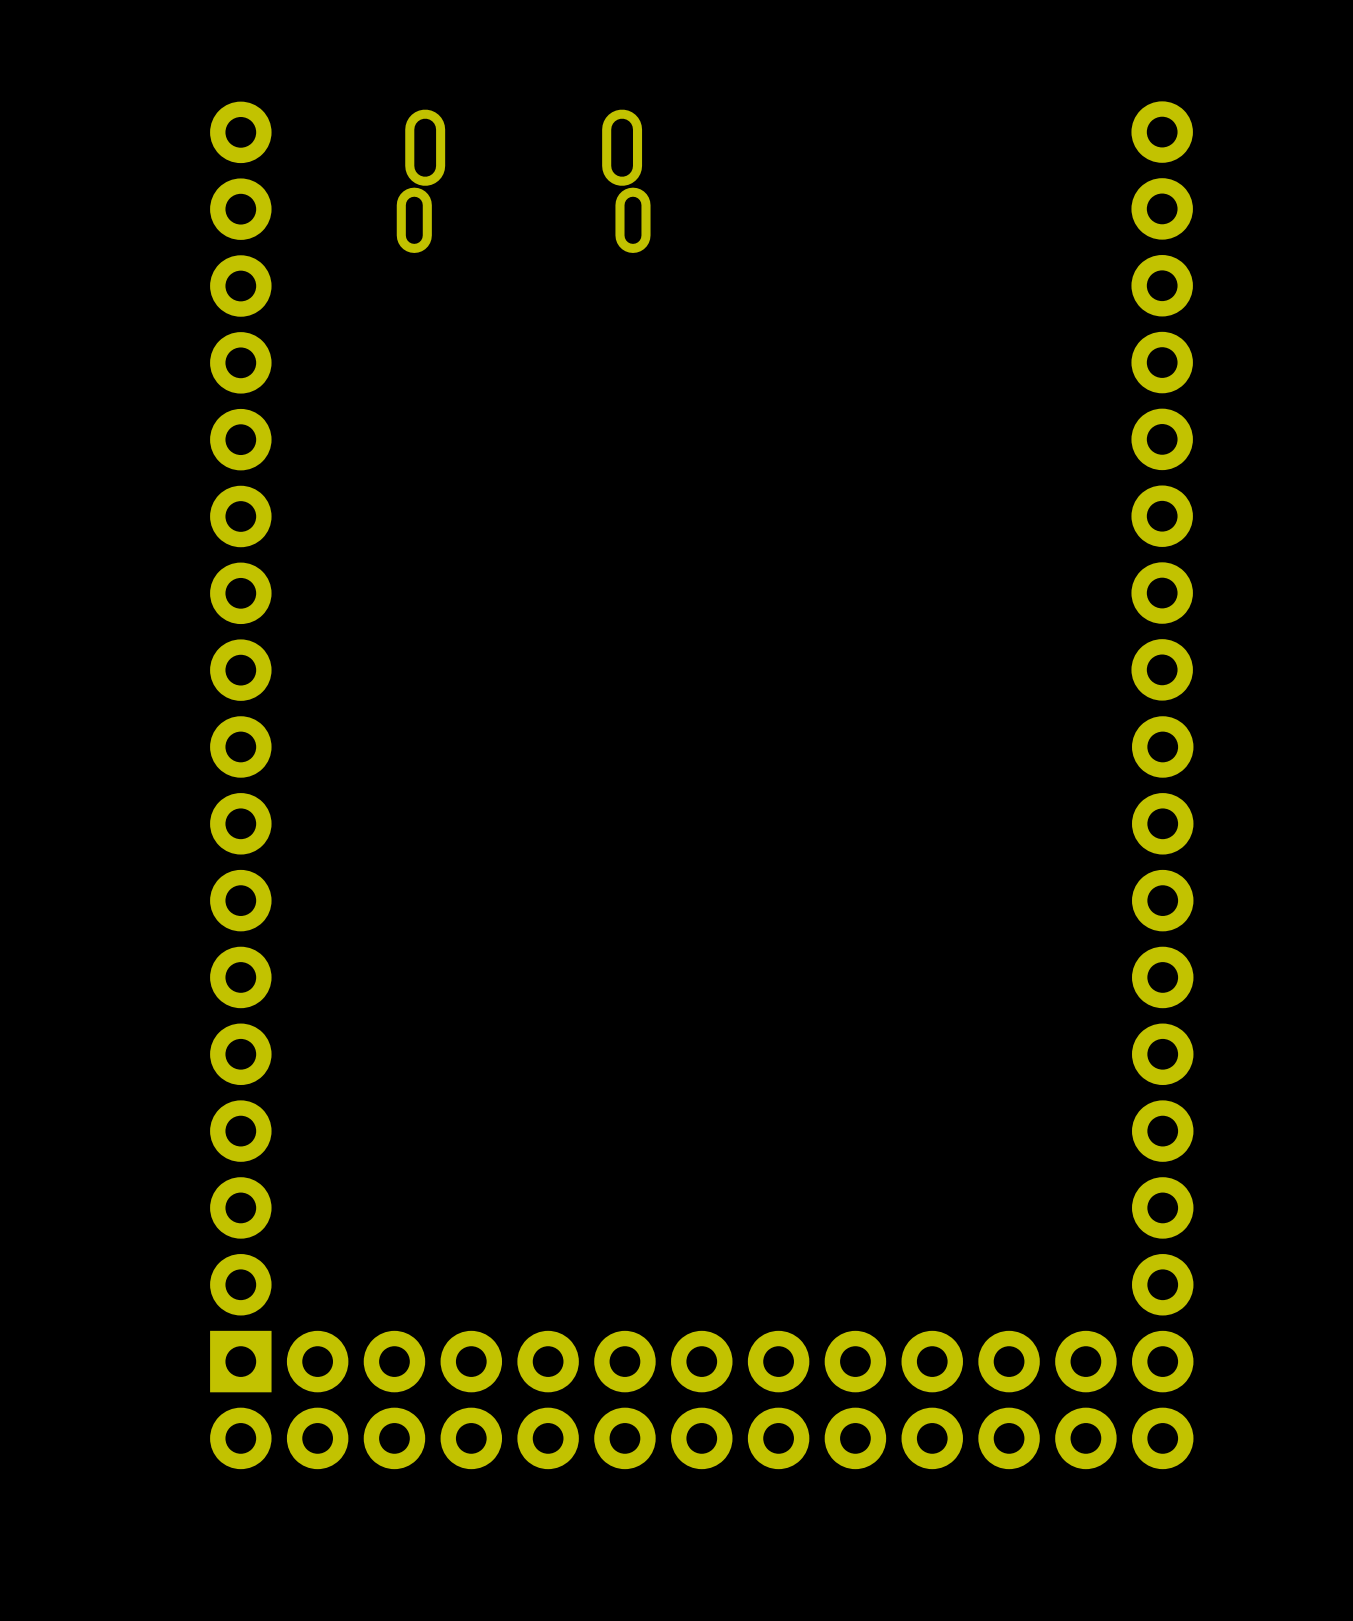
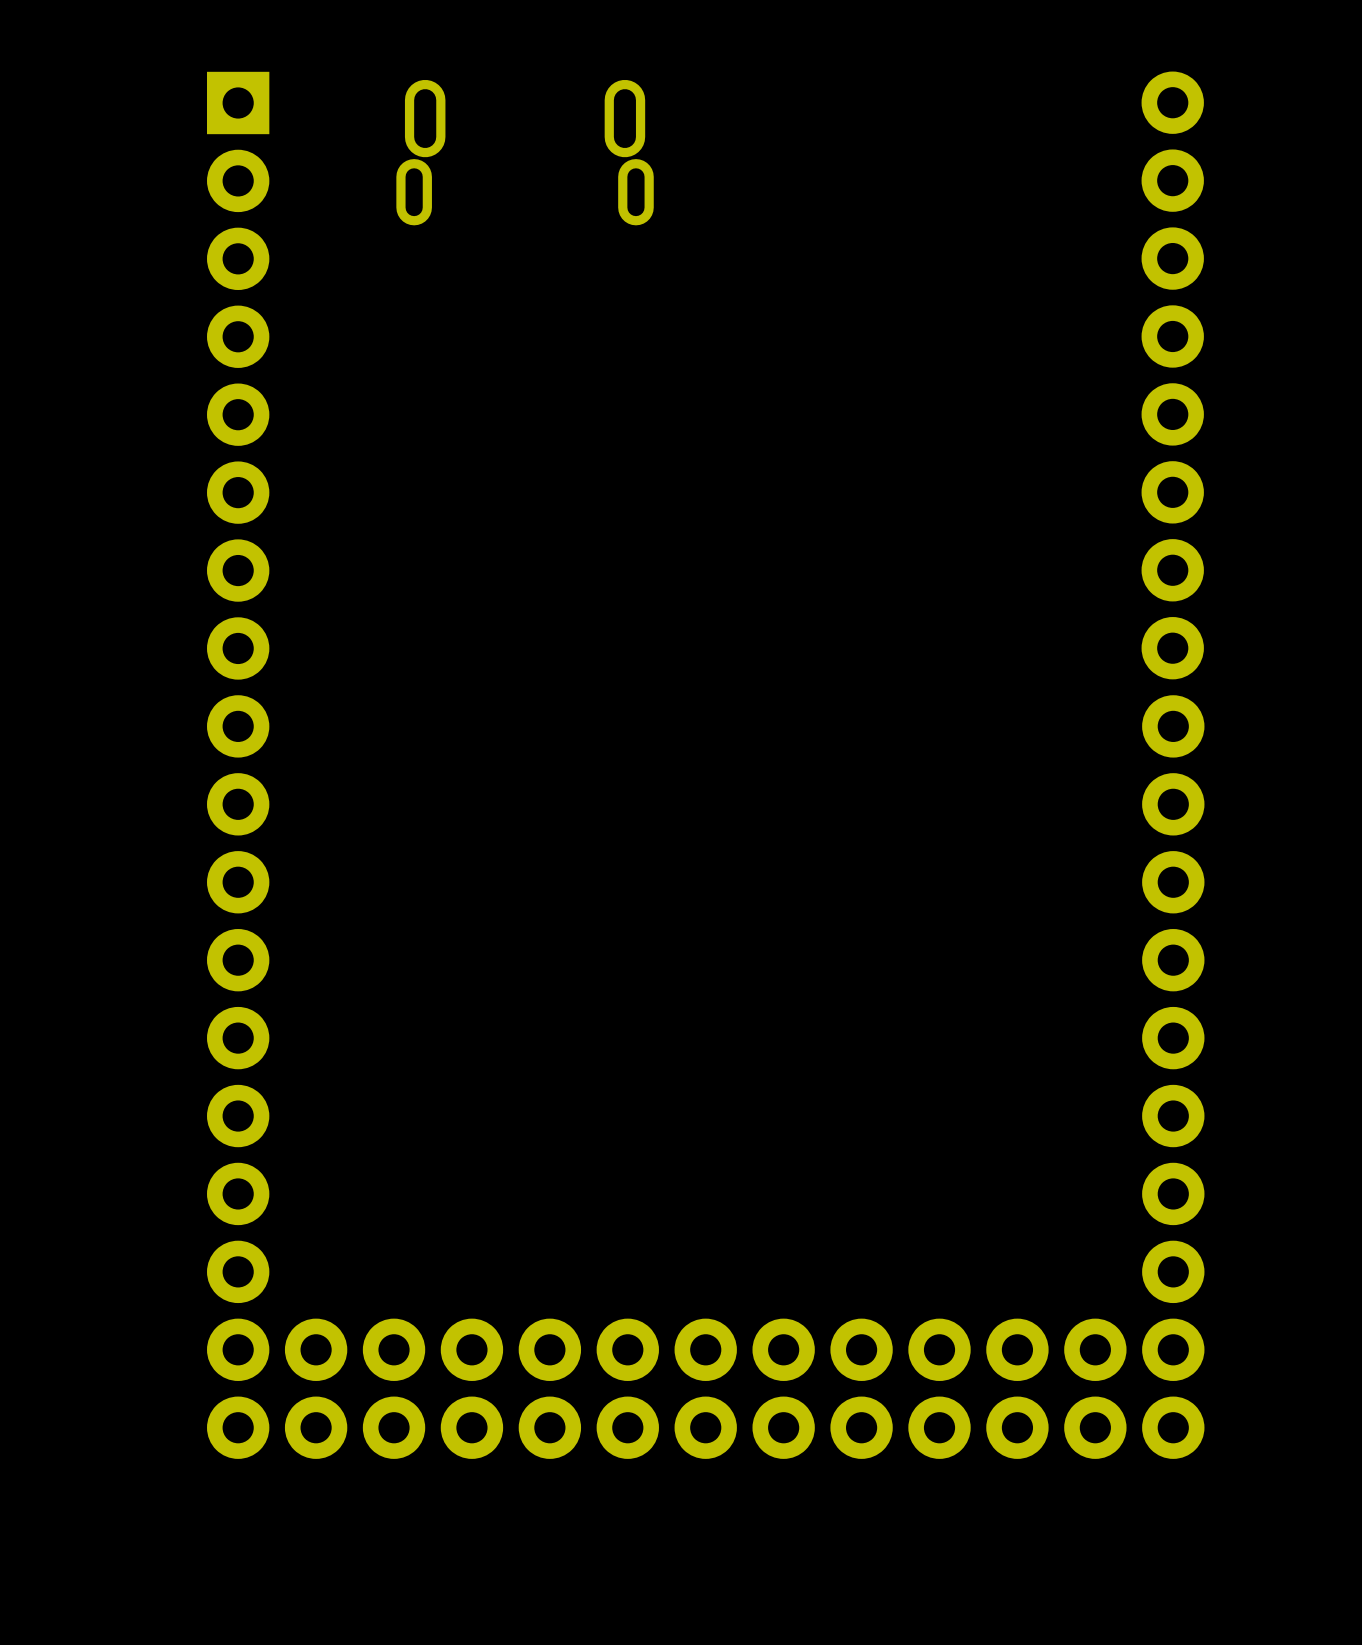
part: none -> (238, 141)
part position: (240, 401) -> (238, 531)
part position: (240, 1015) -> (238, 1154)
part: (240, 1399) -> none

